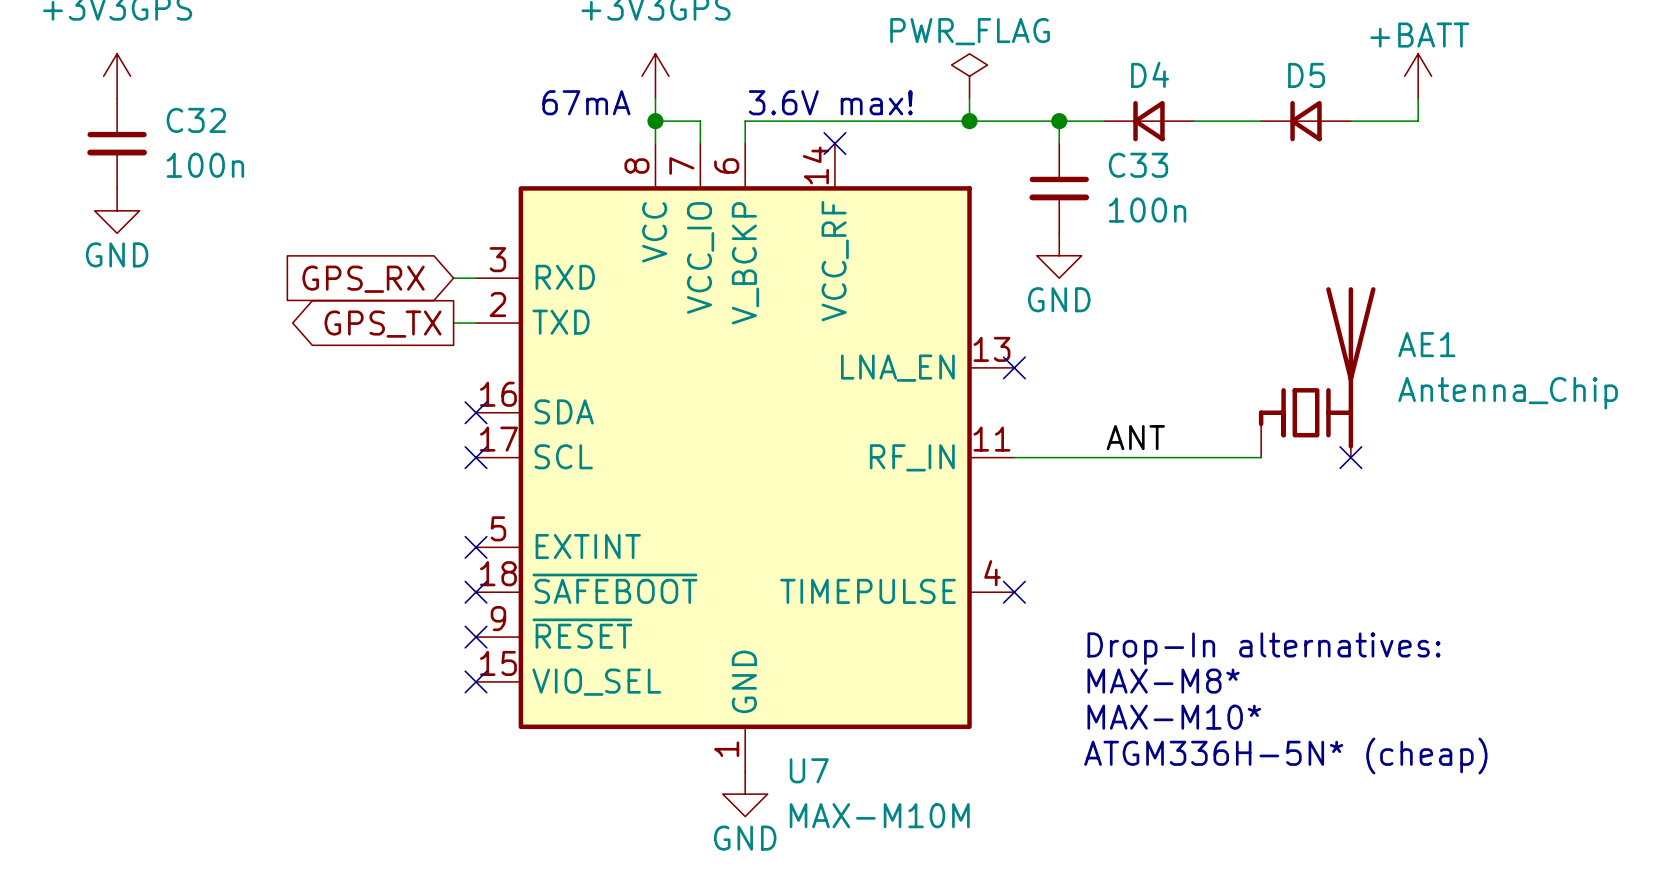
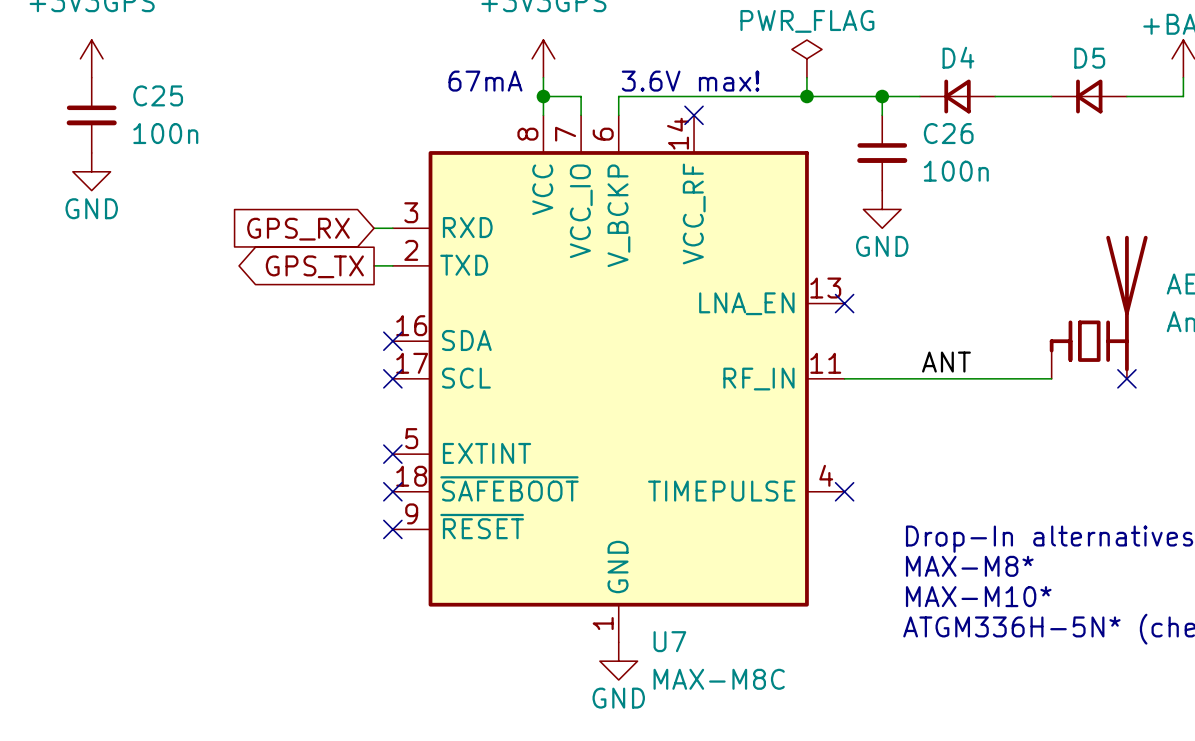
C32 name: C32 (196, 120) -> C25 (158, 95)
U7 symbol: [476, 143, 1015, 772] -> [392, 115, 845, 643]
C33 name: C33 (1138, 165) -> C26 (948, 133)
no-connect mark: (476, 681) -> none
U7 value: MAX-M10M (879, 815) -> MAX-M8C (719, 679)

